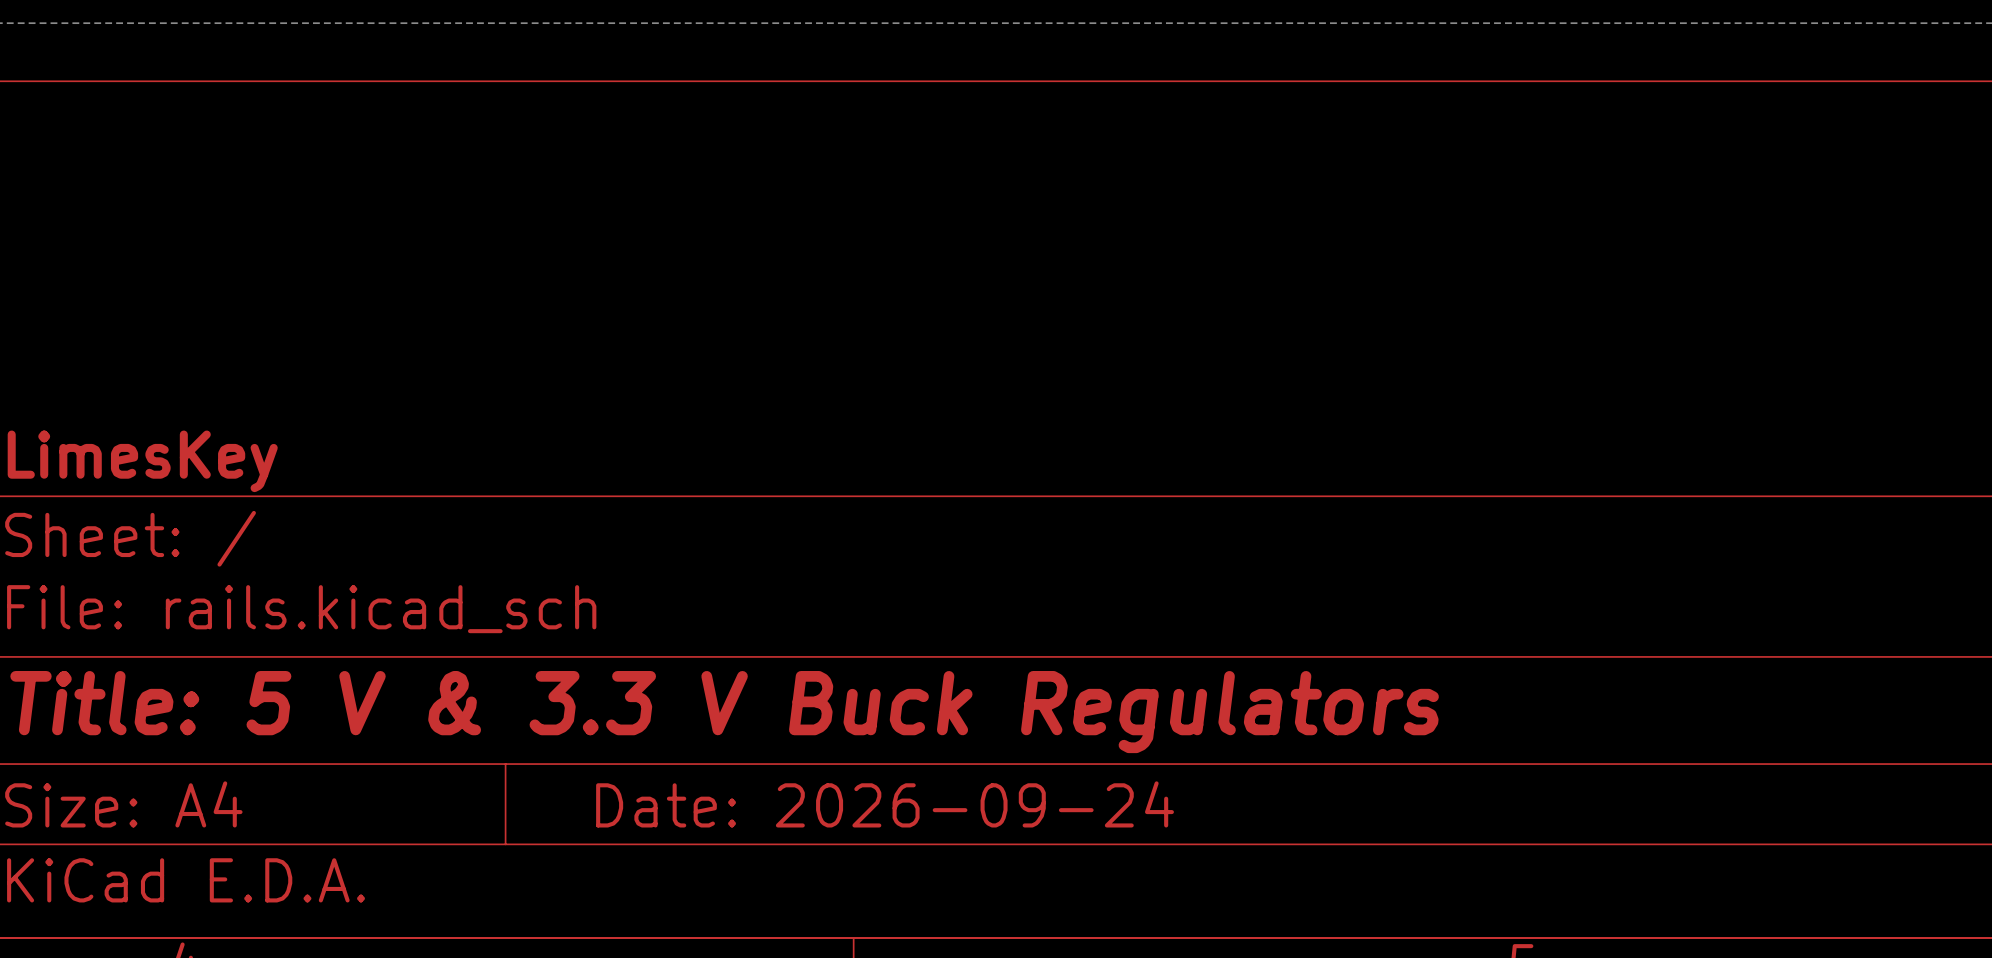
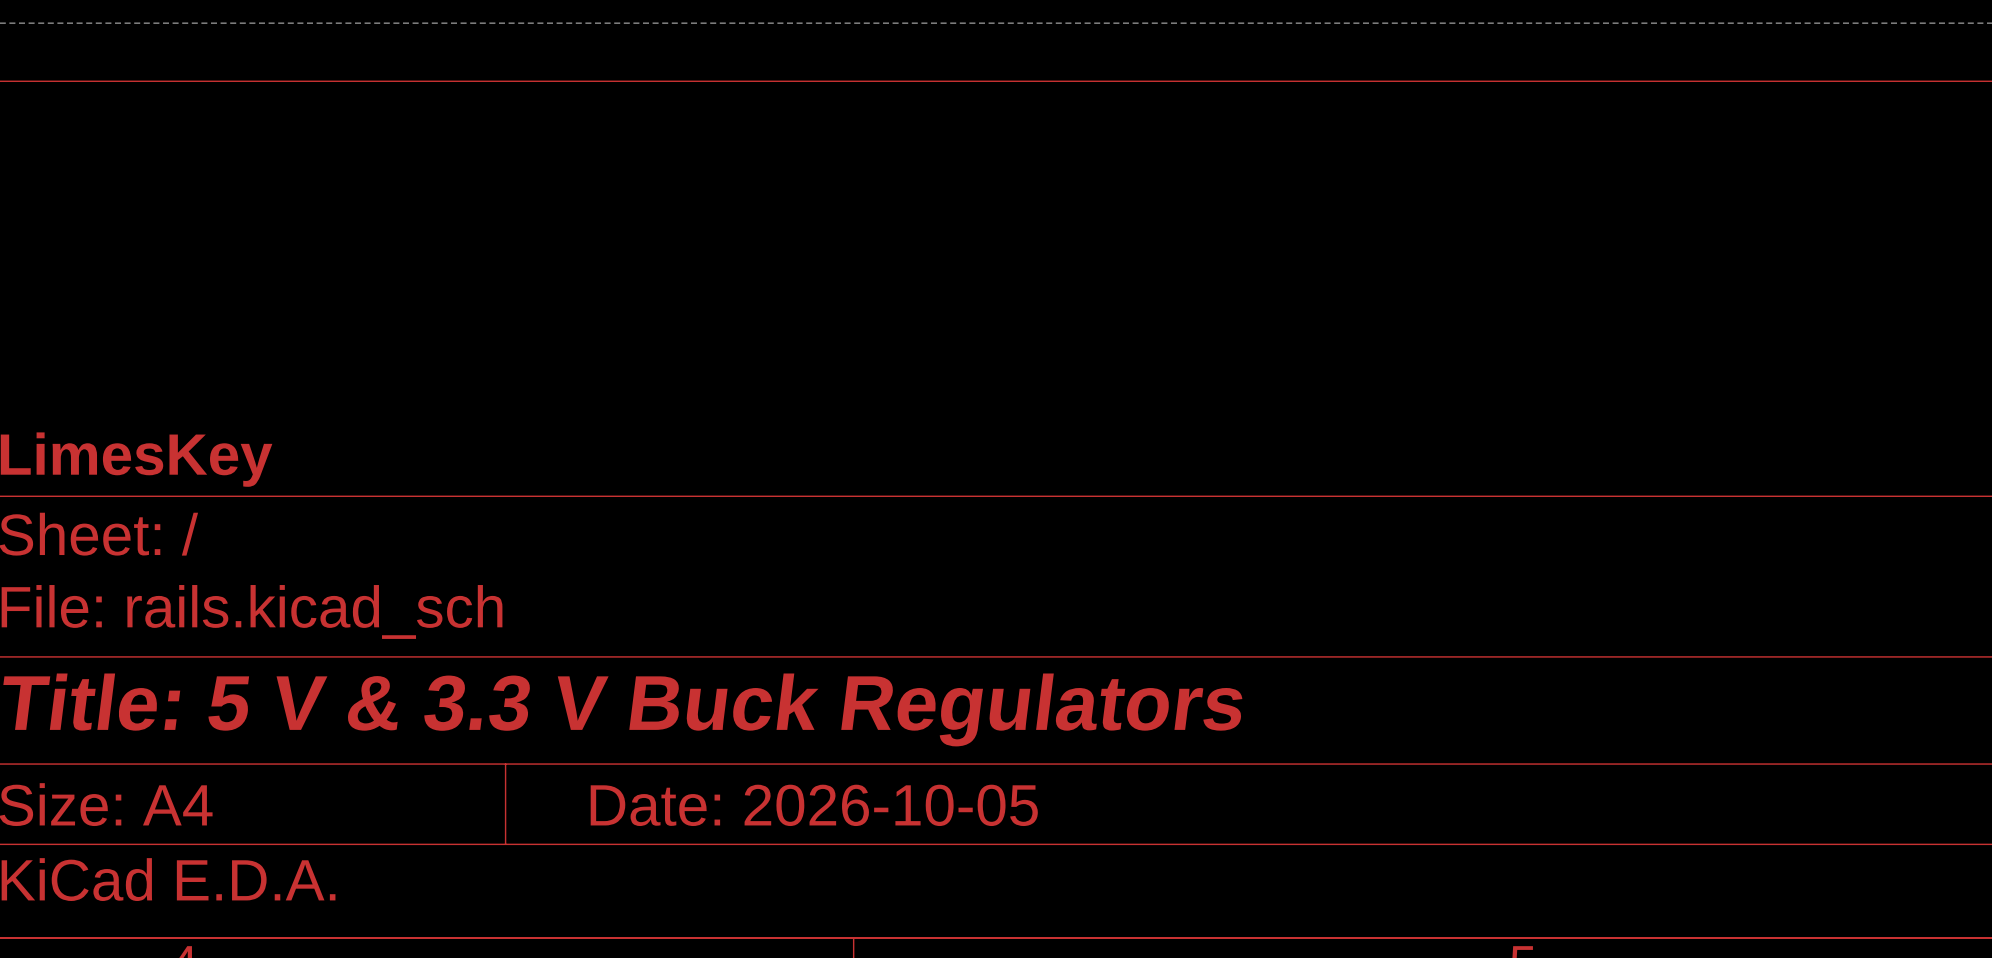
title block: Date: 2026-09-24 (885, 804) -> Date: 2026-10-05 (814, 805)

